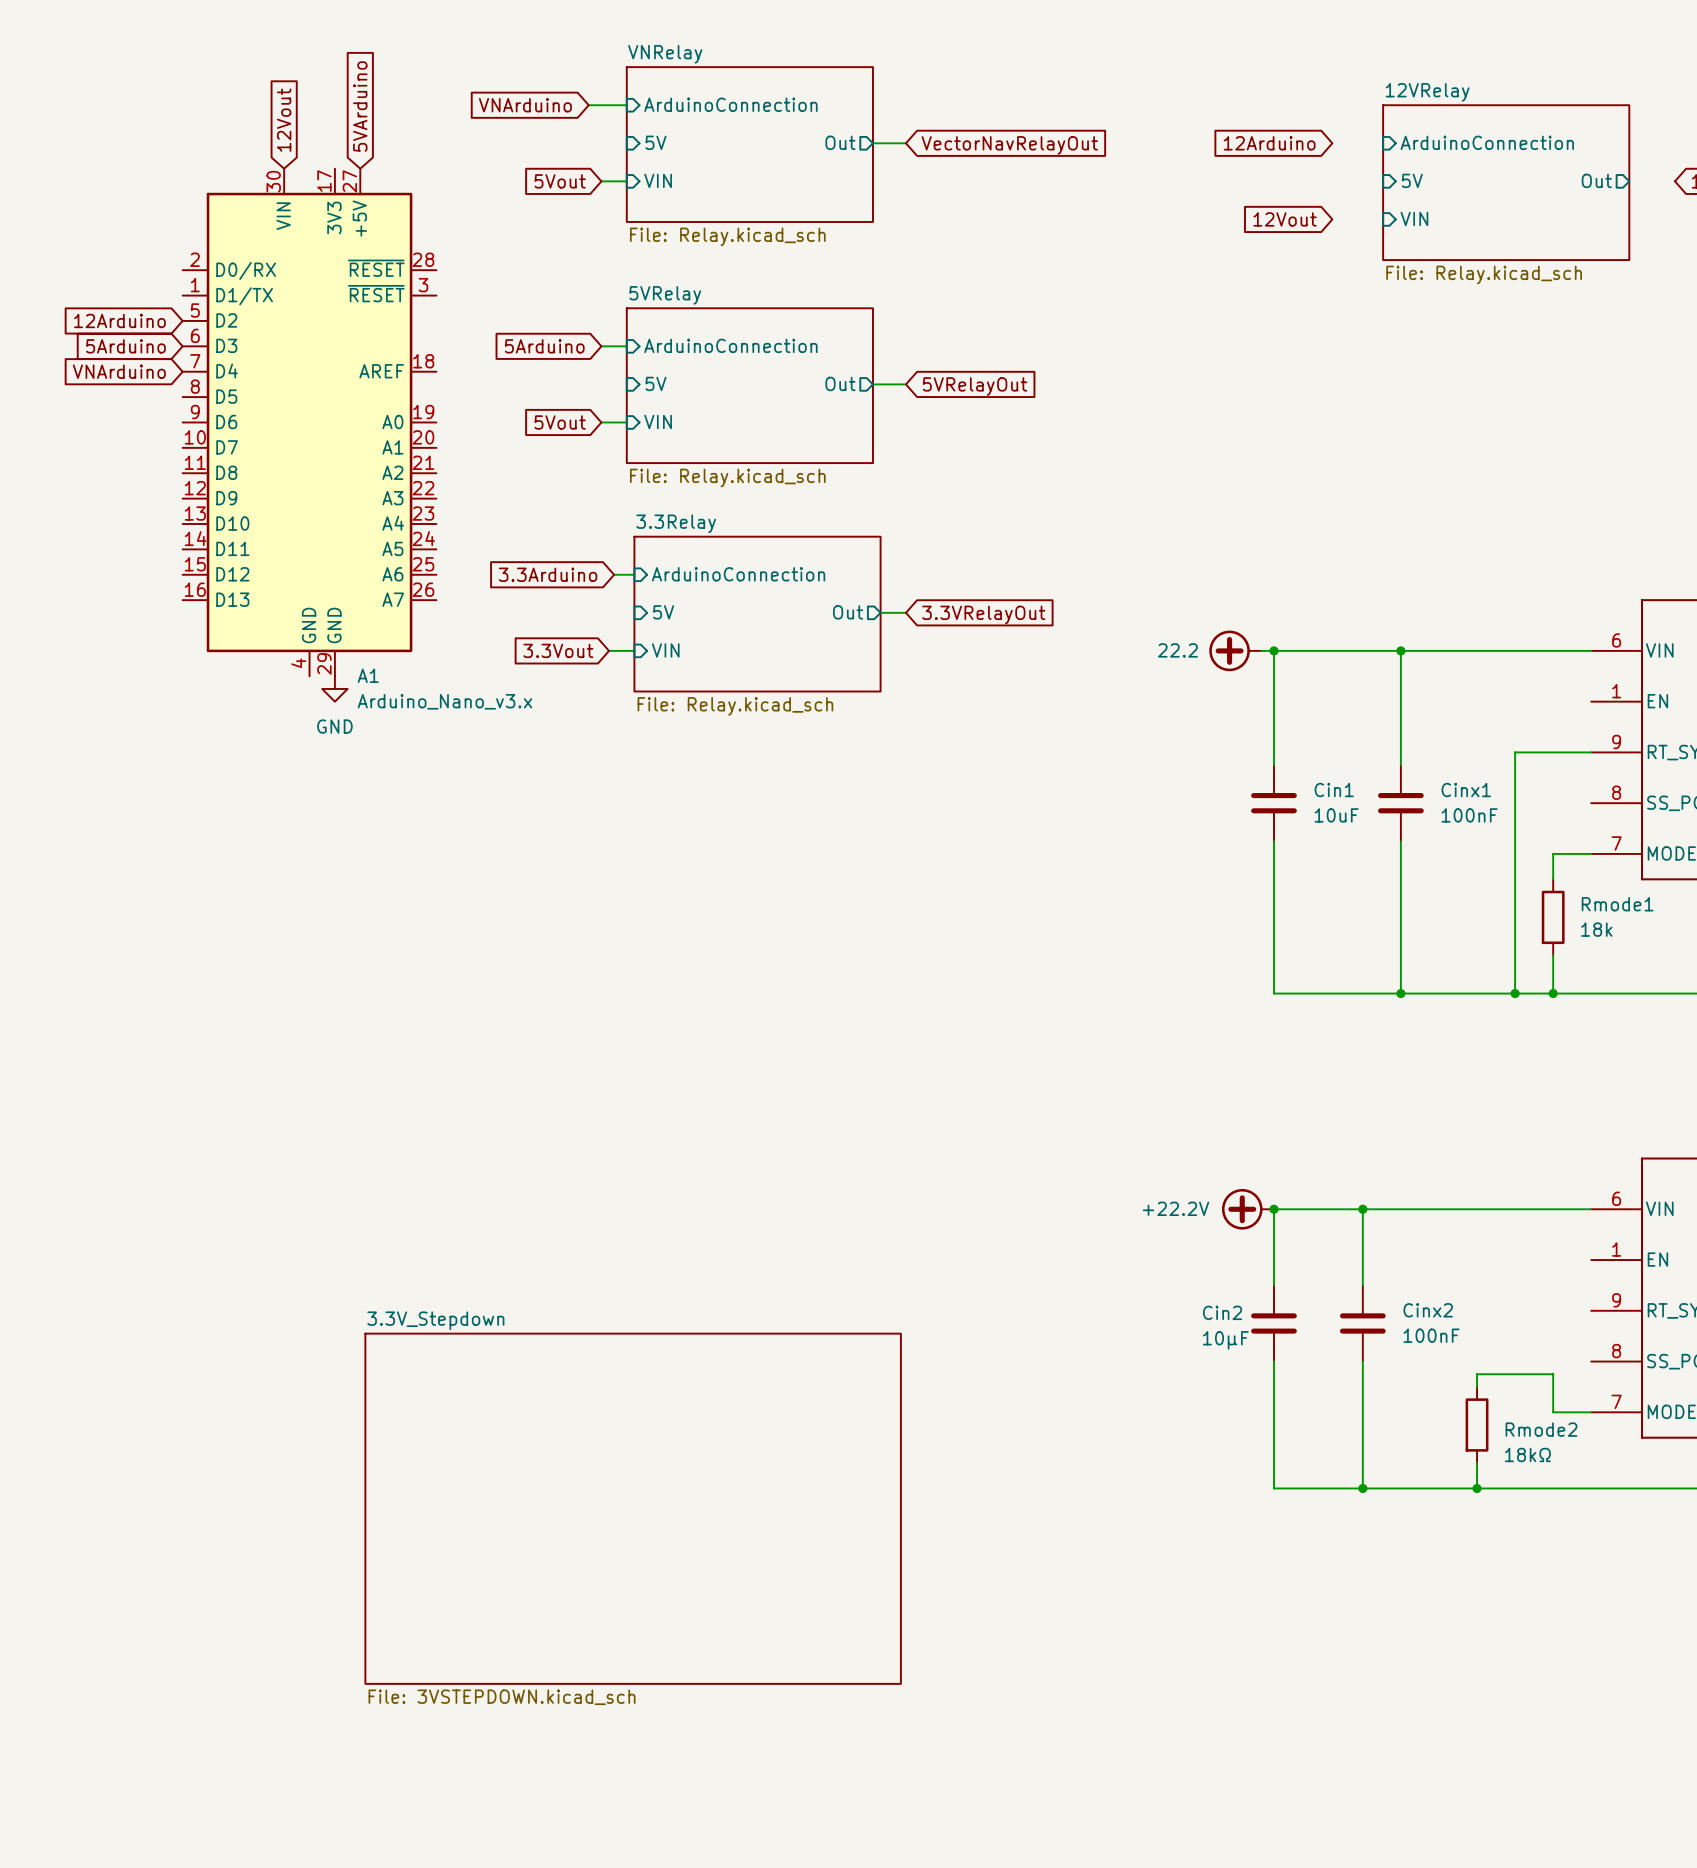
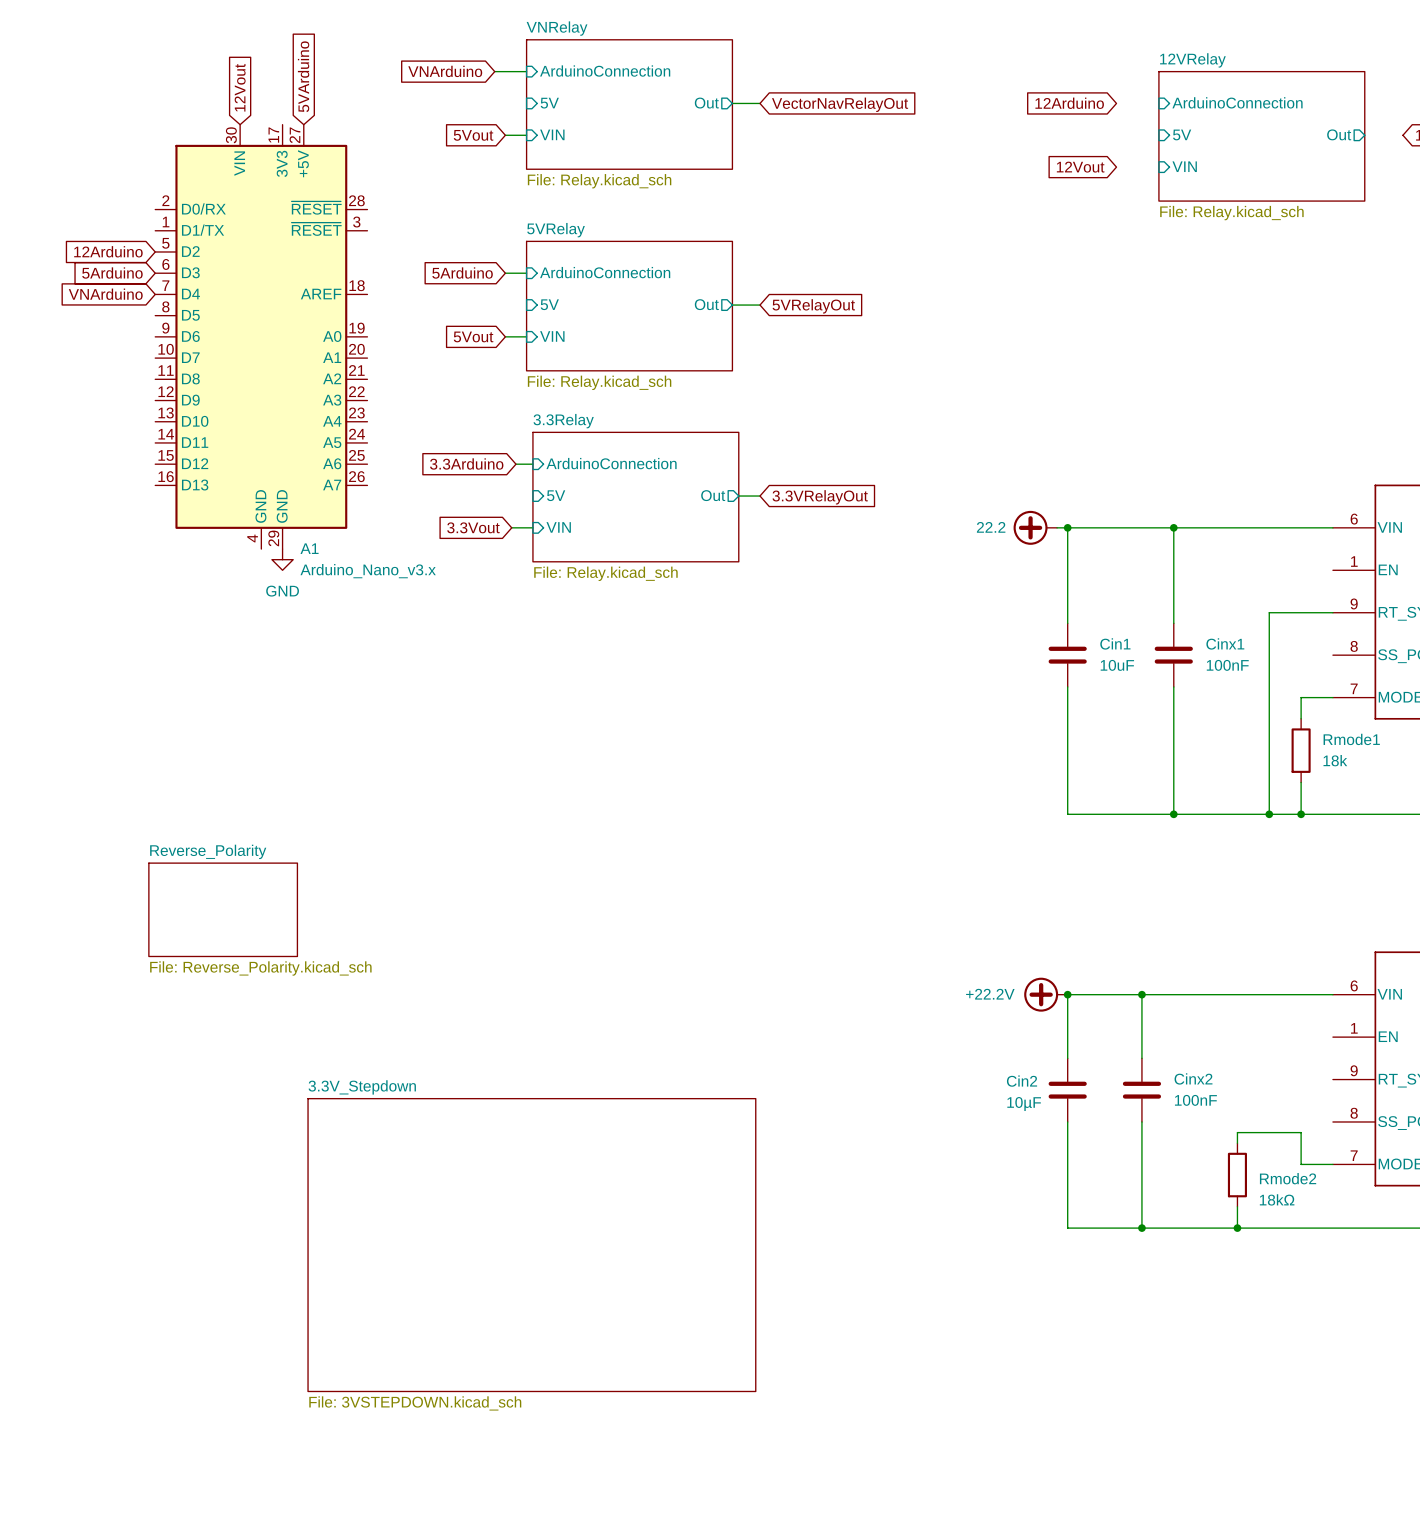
sheet Reverse_Polarity: none -> File: Reverse_Polarity.kicad_sch (223, 909)

